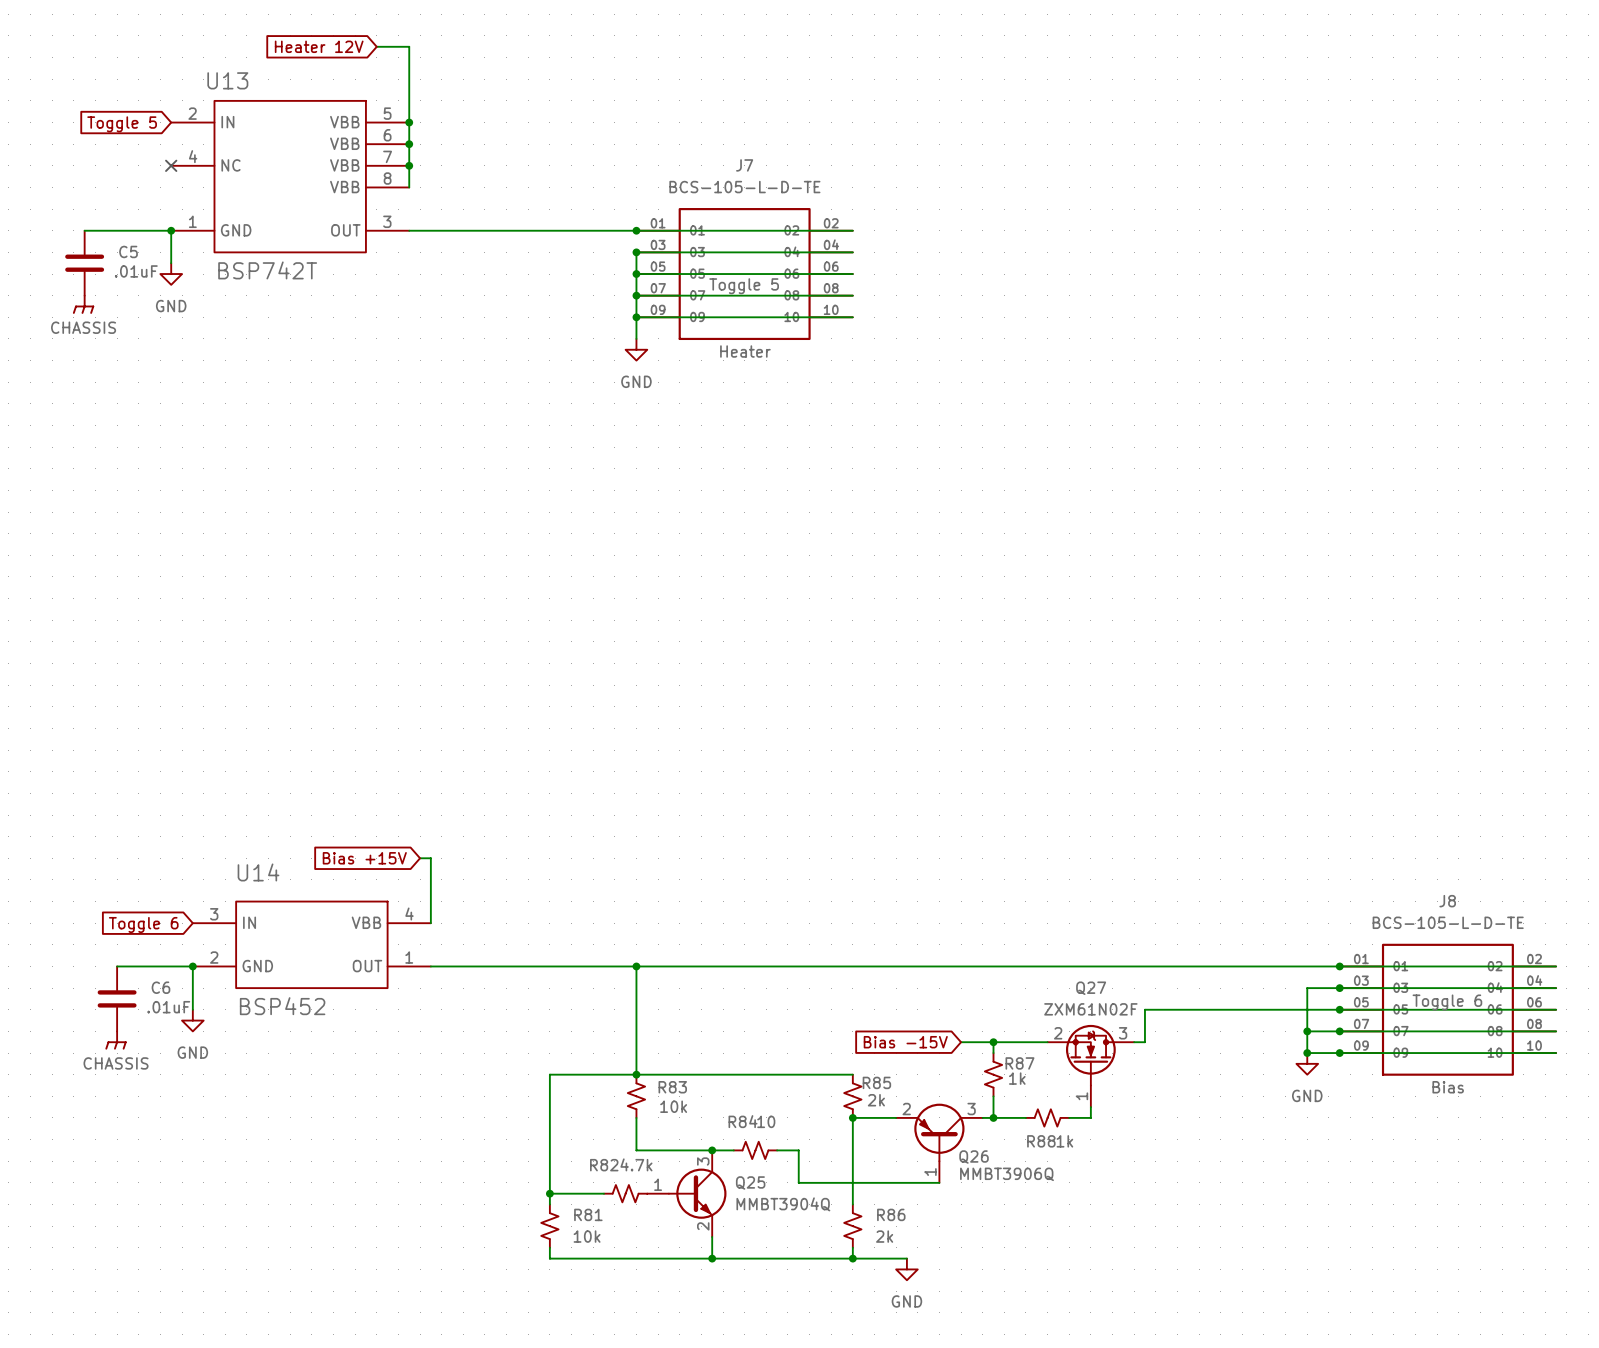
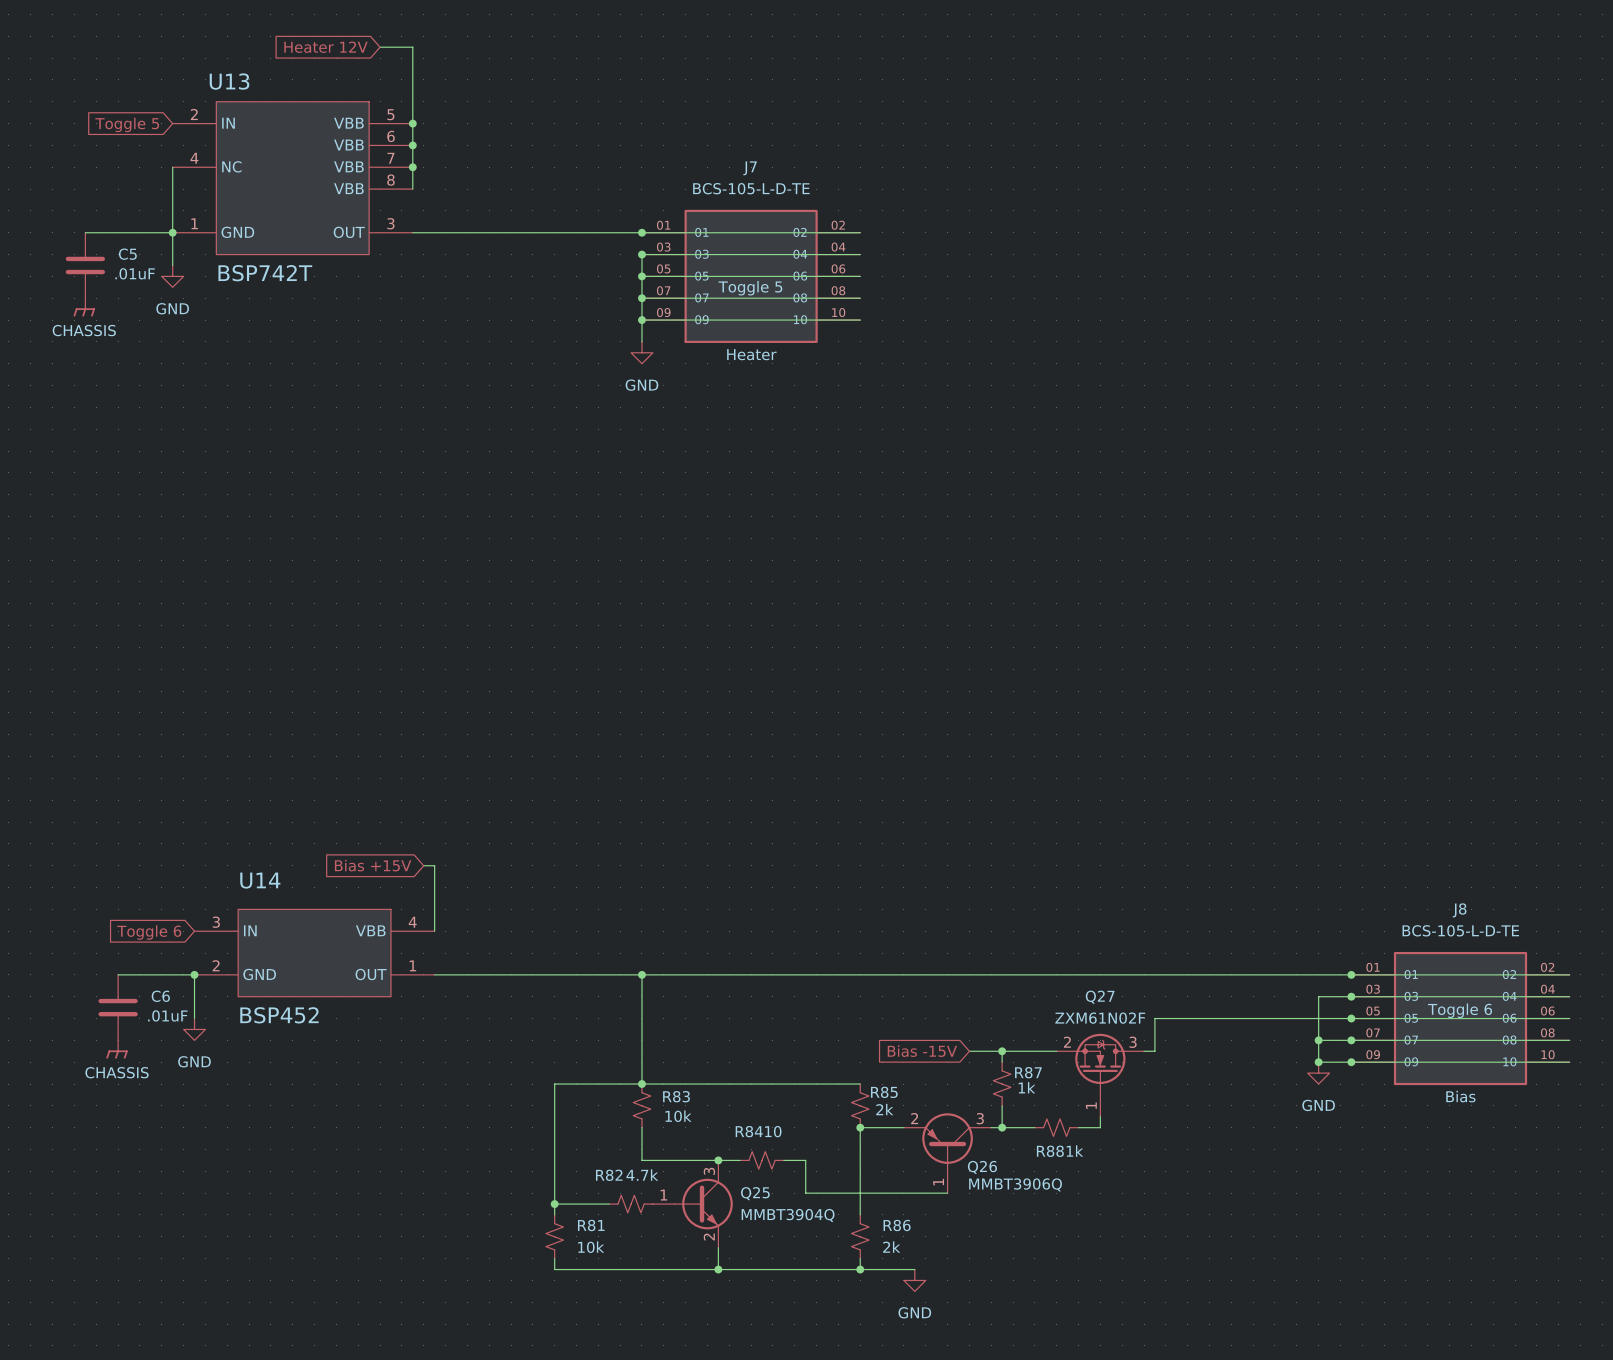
wire: none -> (172, 167) (172, 232)
no-connect mark: (171, 165) -> none

